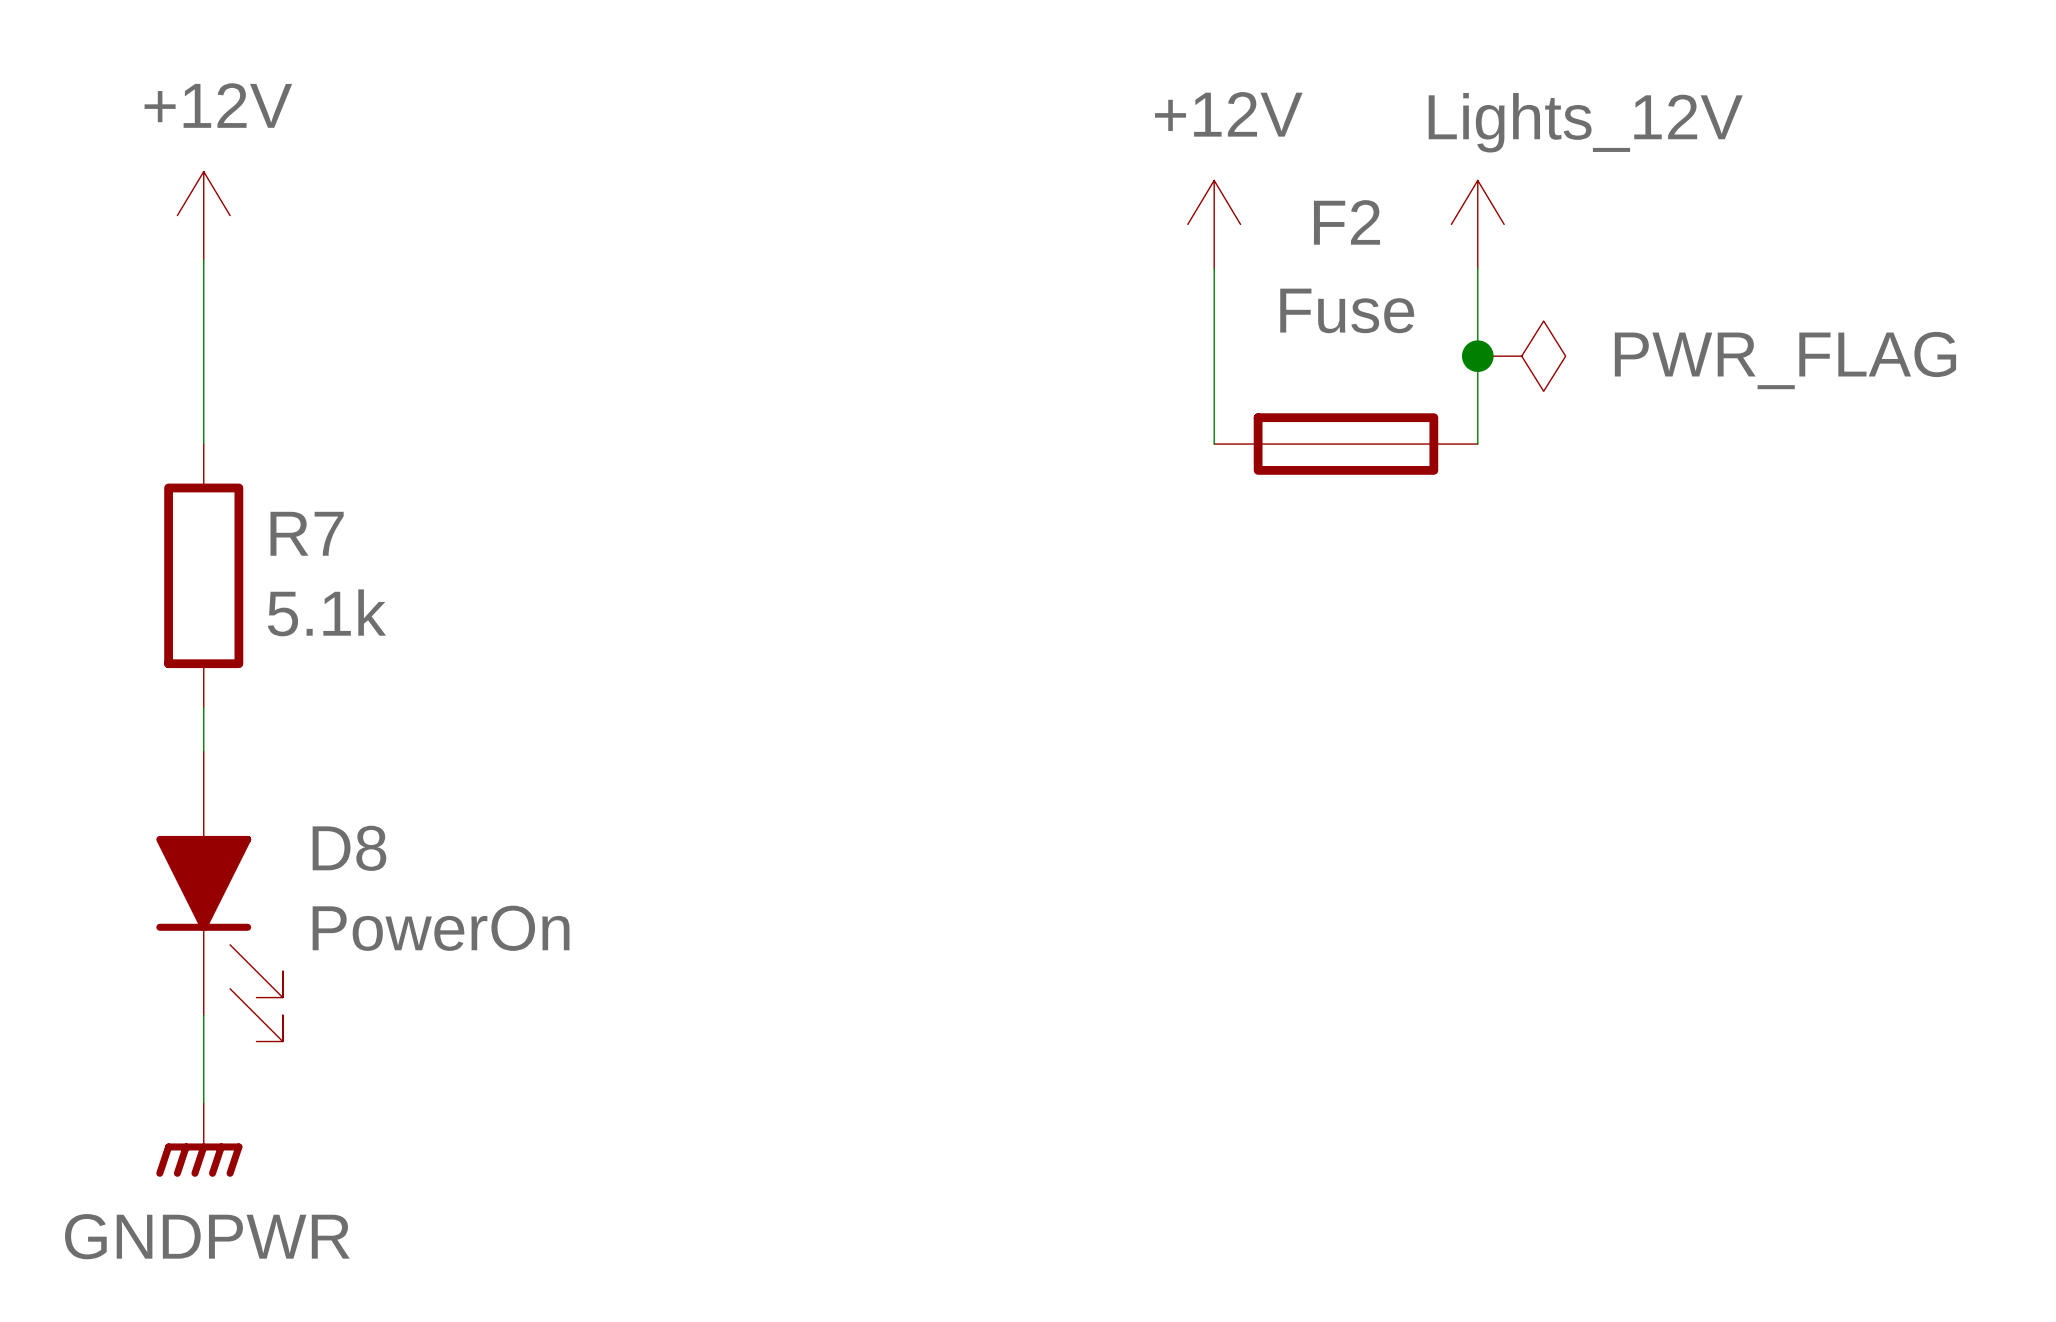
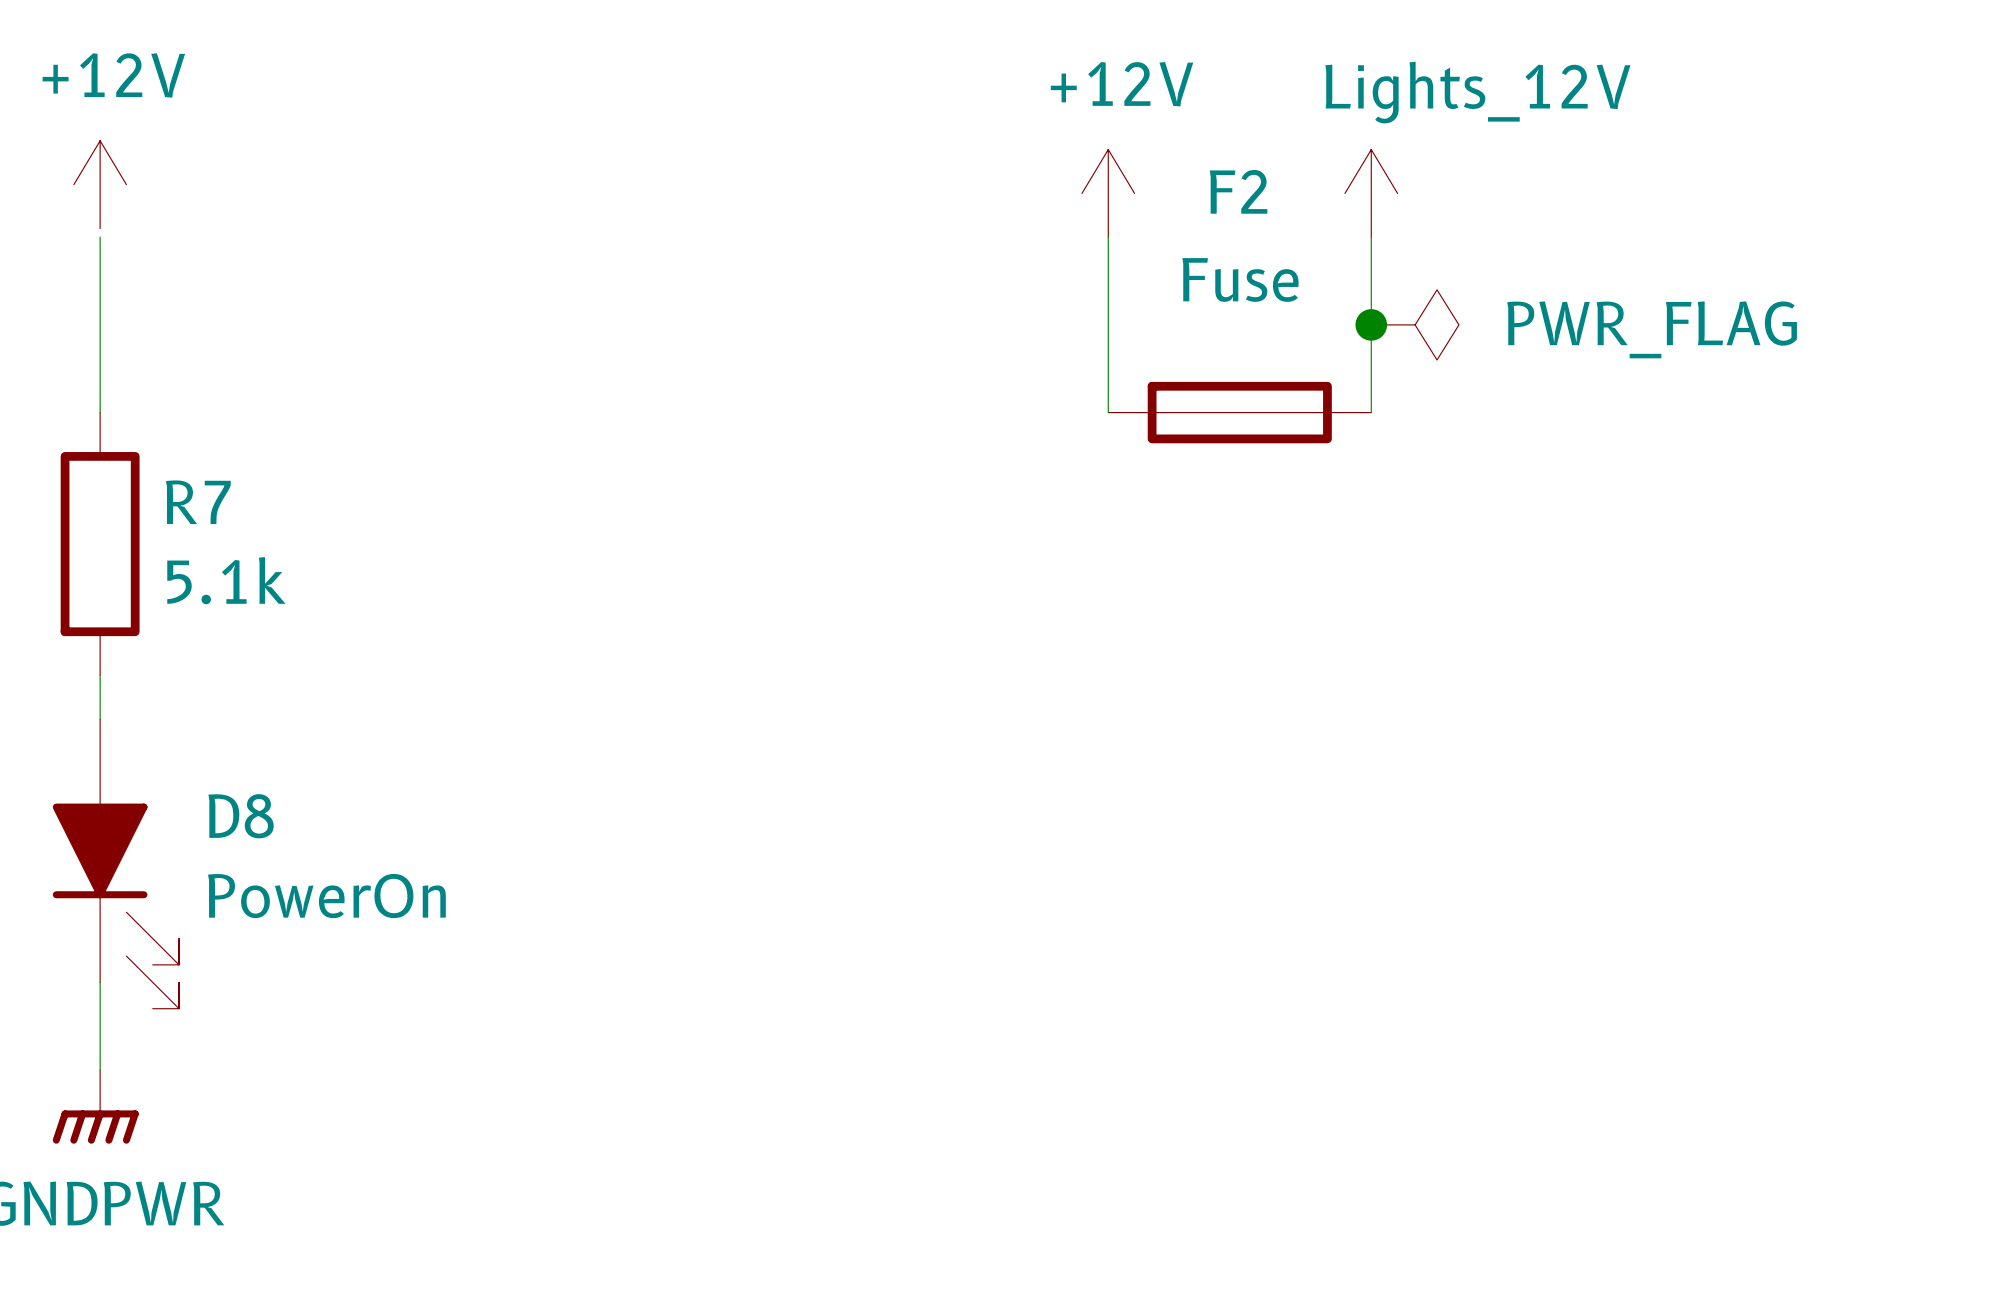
wire: (203, 259) (203, 268) -> none

